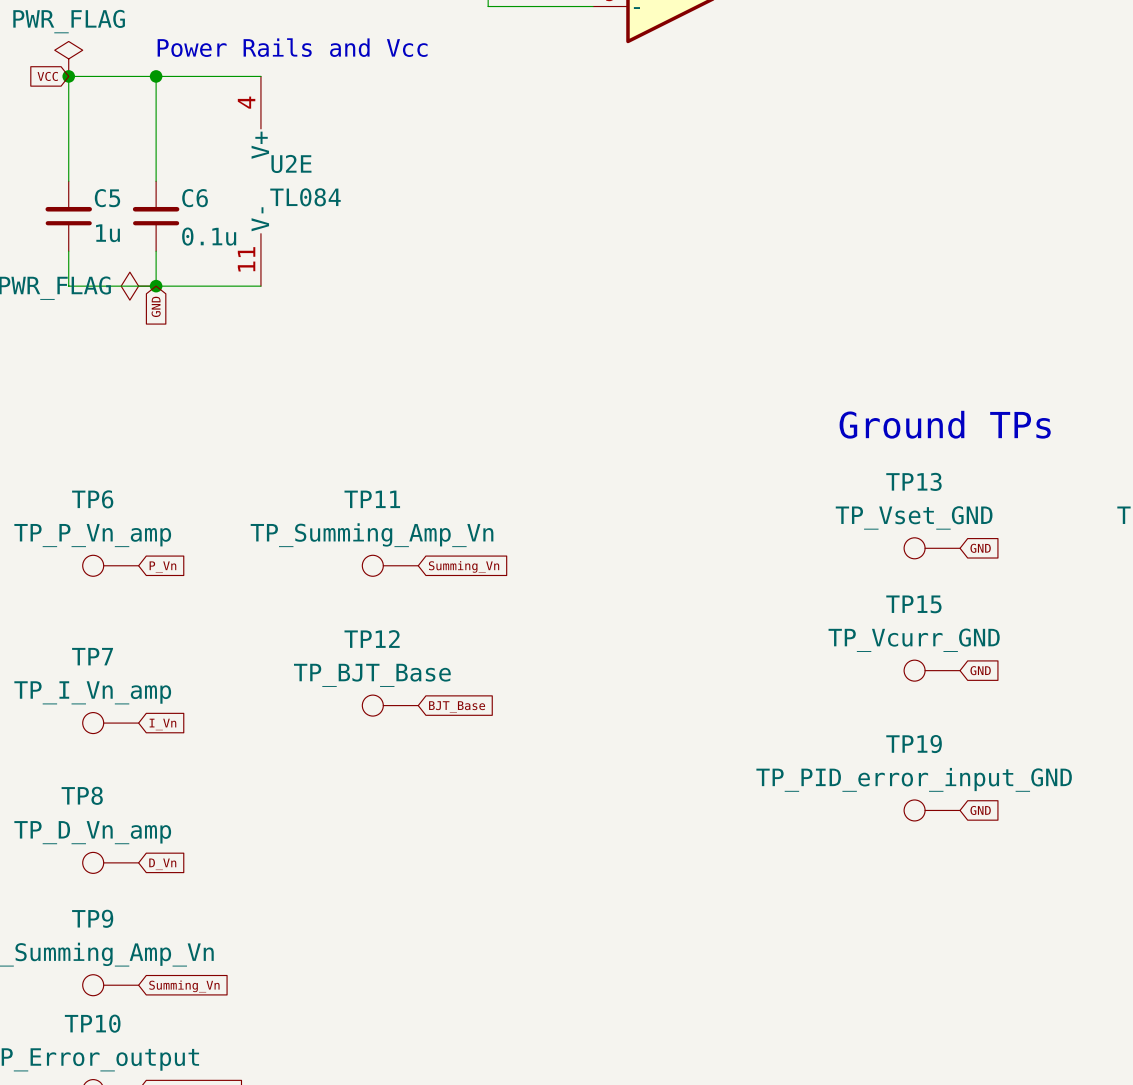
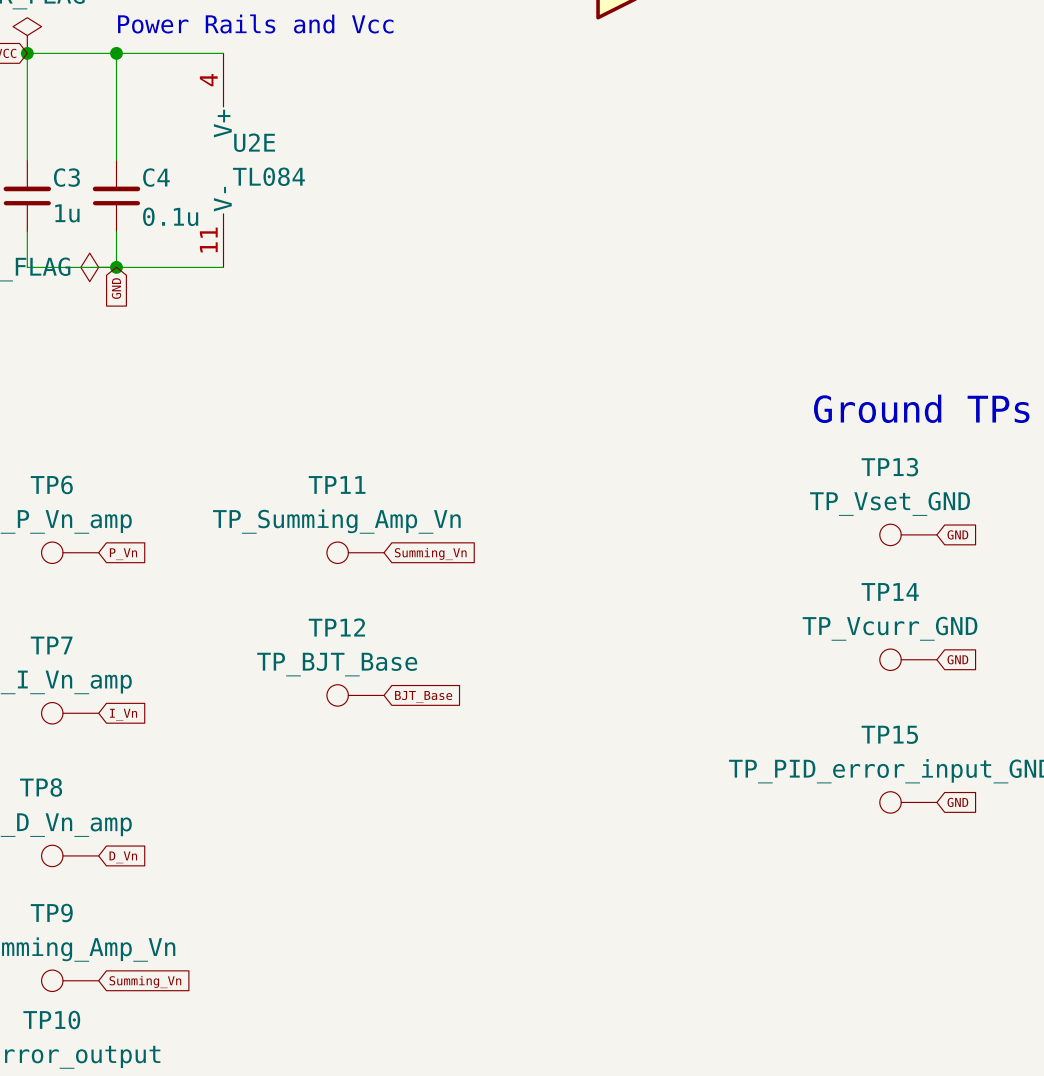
C5 name: C5 (107, 198) -> C3 (66, 177)
C6 name: C6 (195, 198) -> C4 (156, 177)
TP15 name: TP15 (913, 604) -> TP14 (890, 591)
TP19 name: TP19 (914, 744) -> TP15 (889, 734)

